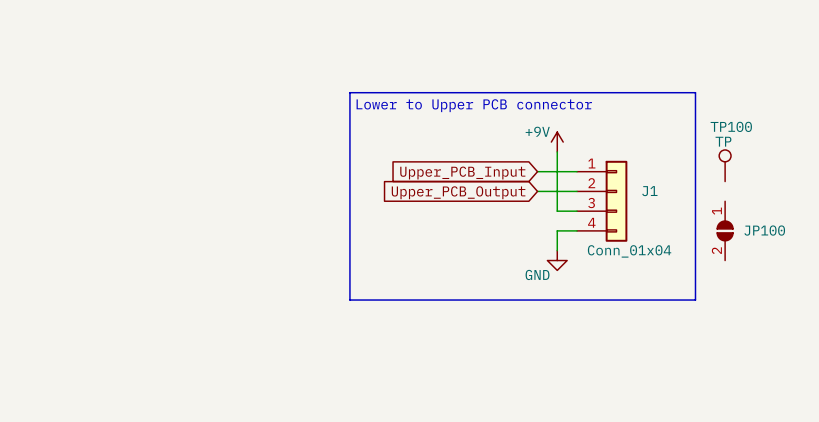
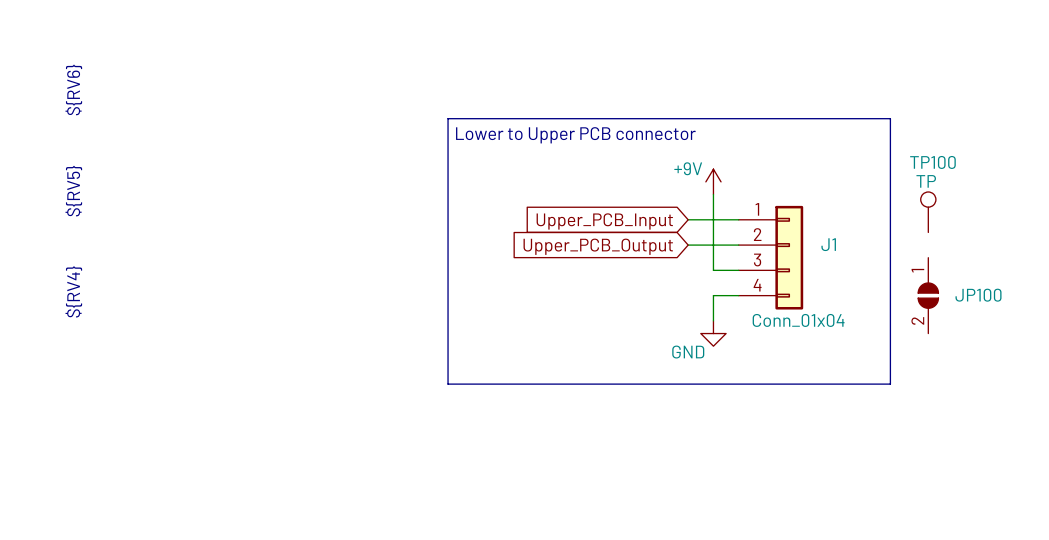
text: none -> ${RV6} (73, 90)
text: none -> ${RV5} (73, 191)
text: none -> ${RV4} (73, 291)

